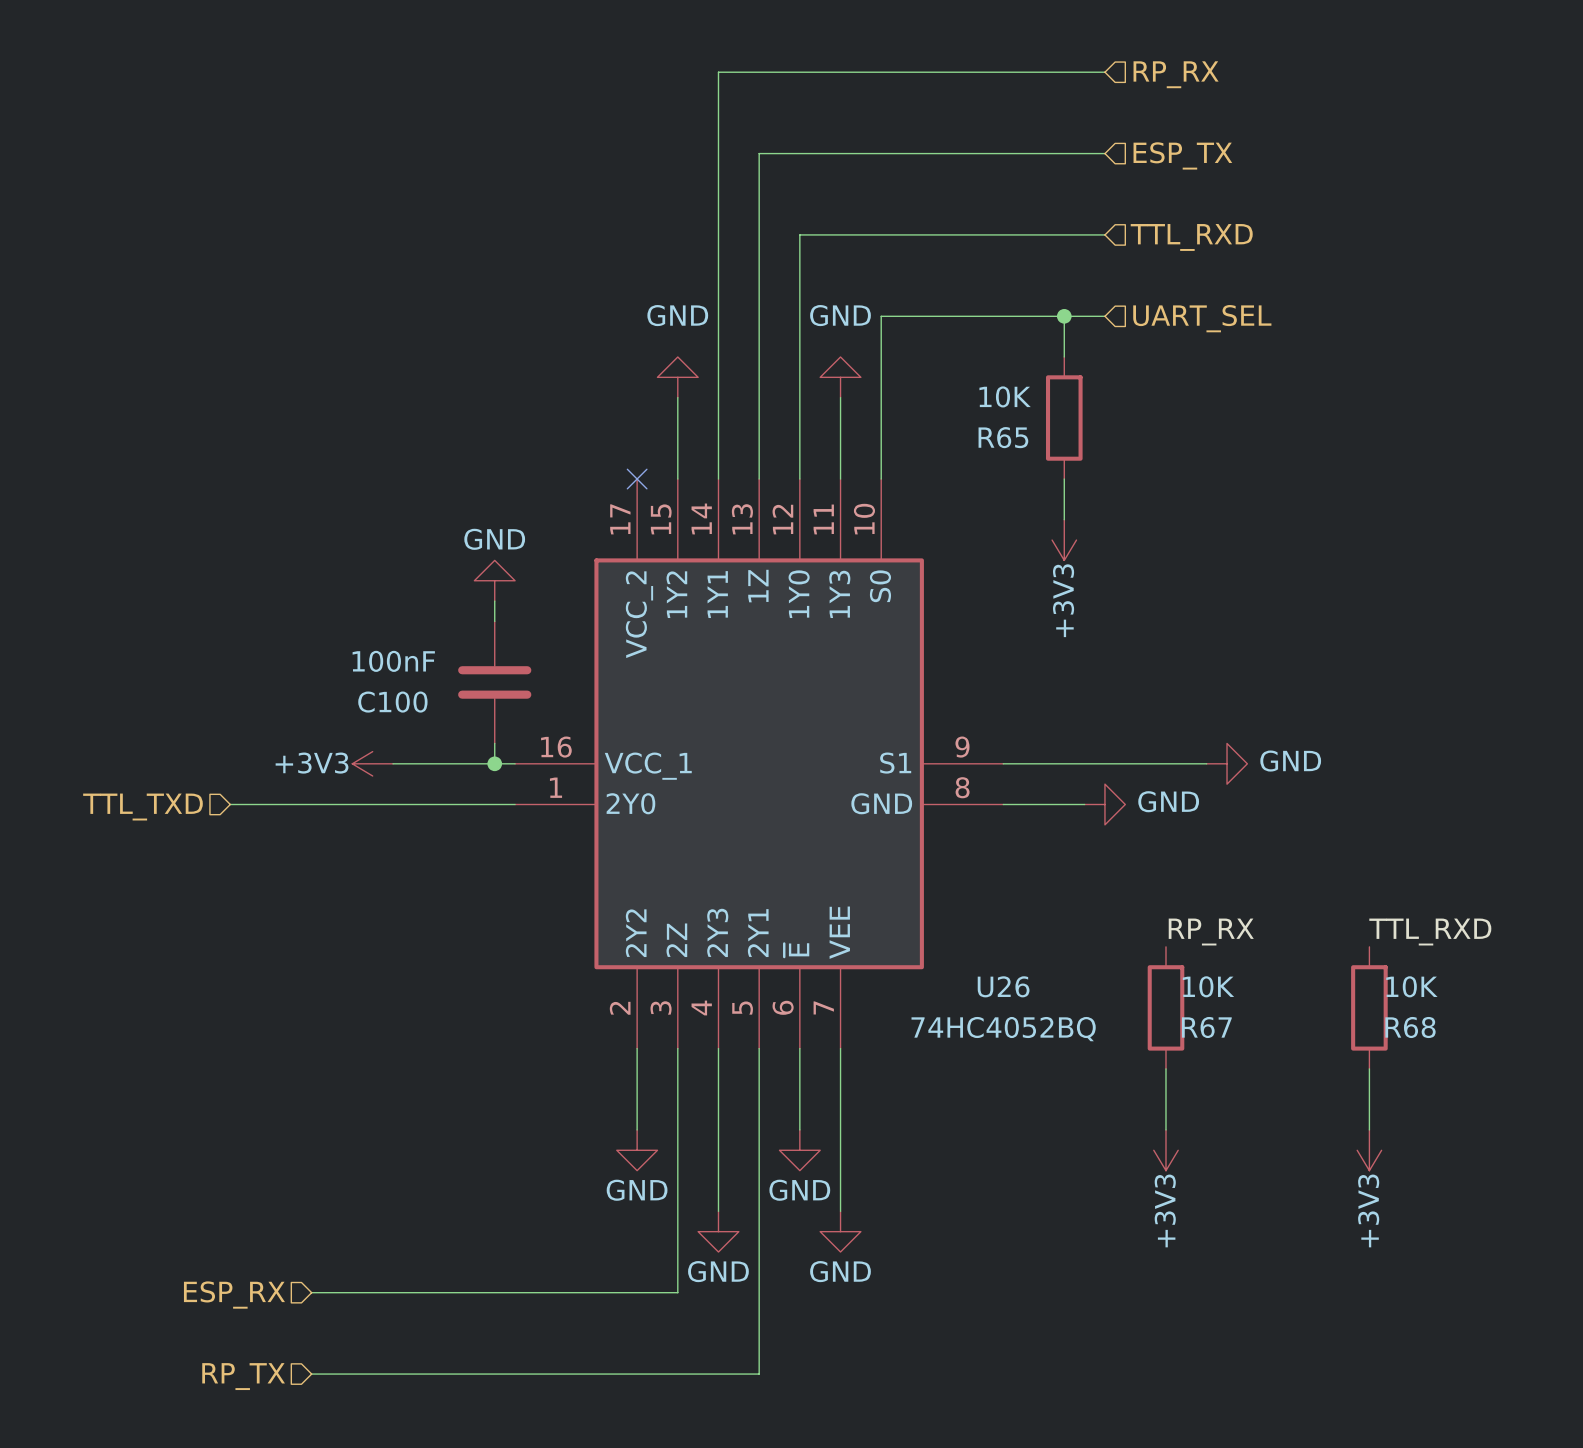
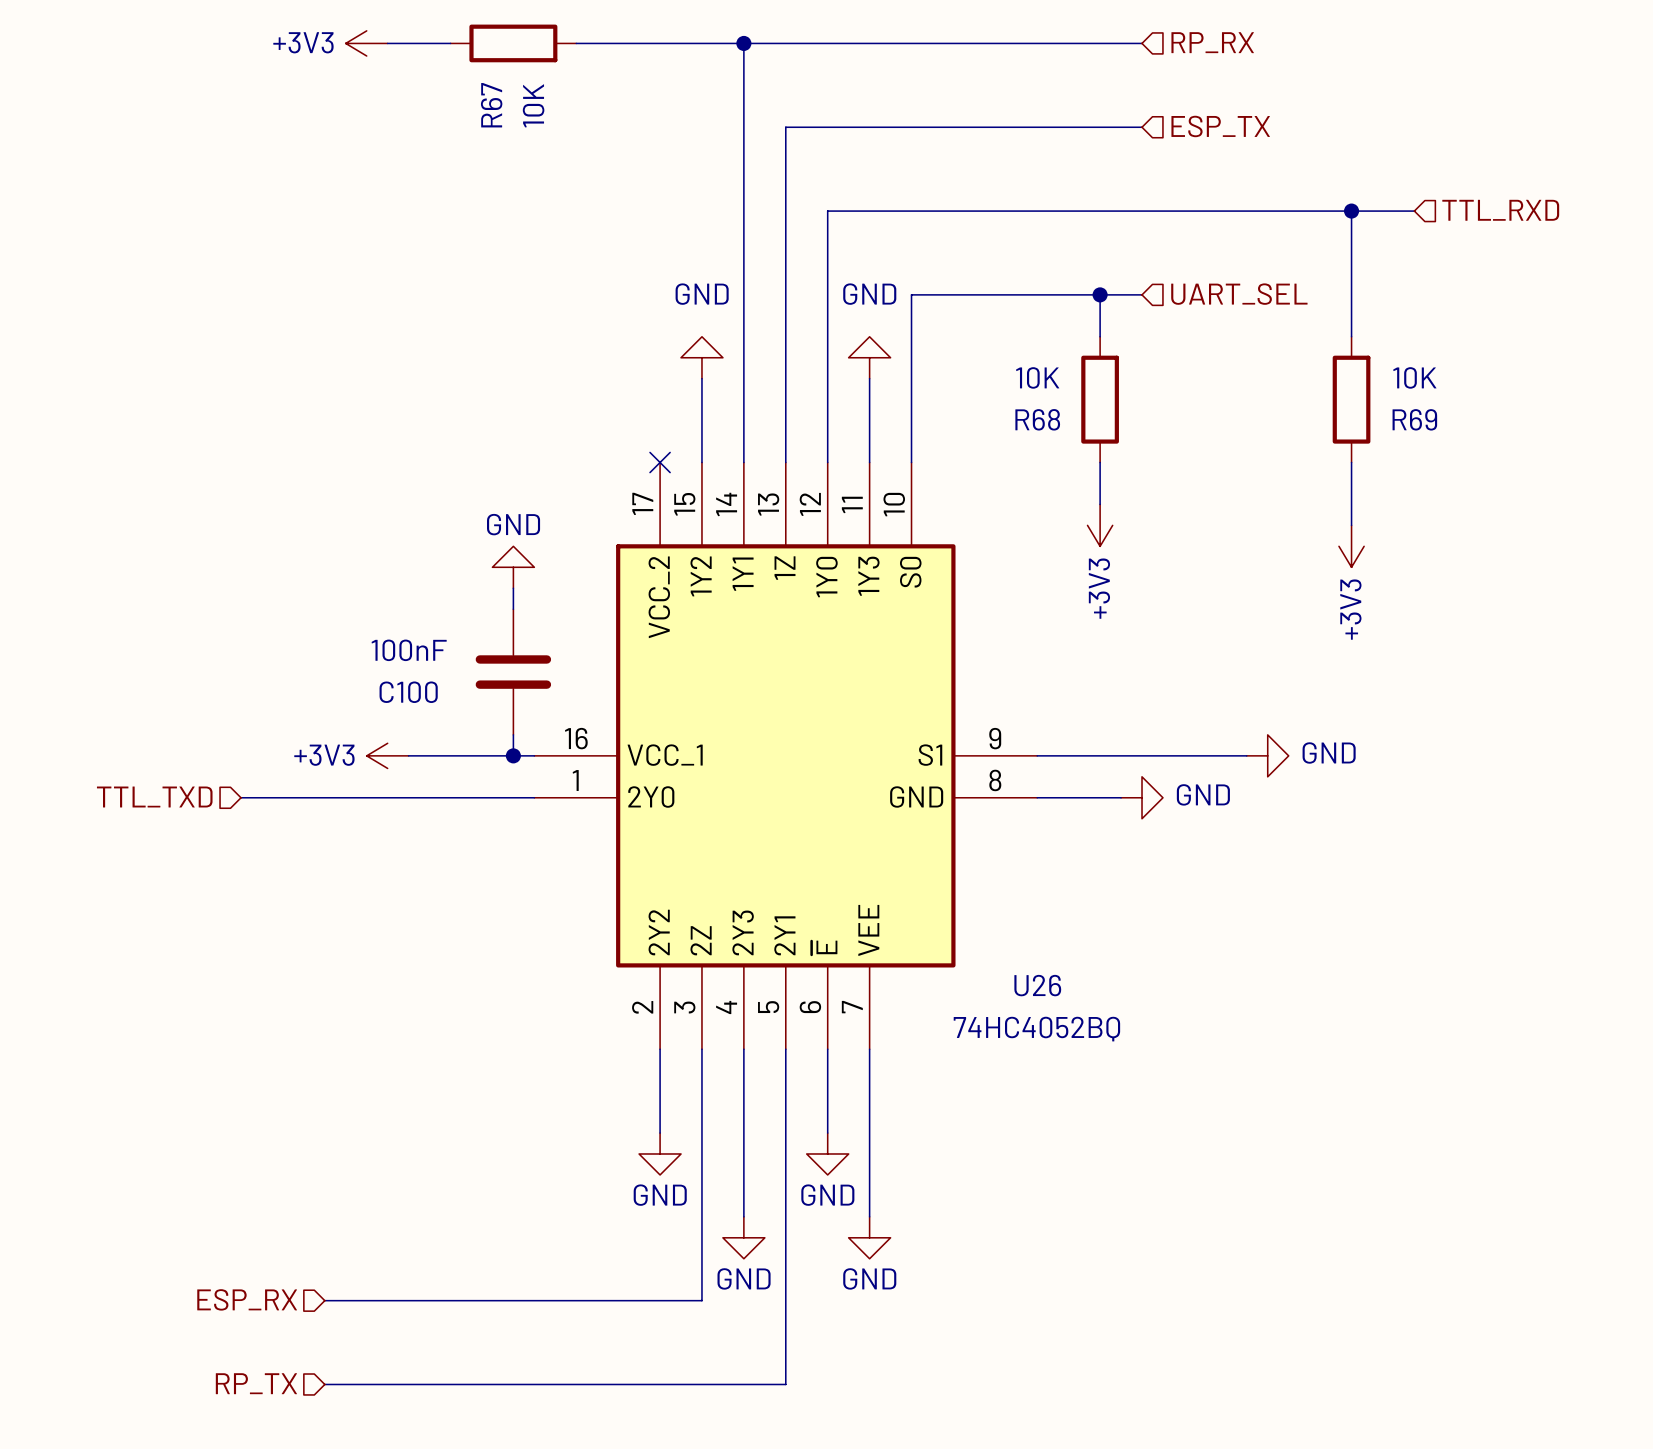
power symbol: none -> +3V3 (366, 43)
wire: none -> (387, 43) (450, 43)
wire: none -> (576, 43) (743, 43)
junction: none -> (743, 43)
wire: none -> (1142, 211) (1414, 211)
wire: none -> (1351, 211) (1351, 336)
junction: none -> (1351, 211)
hierarchical label position: TTL_RXD (1191, 237) -> TTL_RXD (1500, 210)
R69: none -> 10K (1351, 399)
R65 name: R65 (1003, 437) -> R68 (1037, 419)
wire: none -> (1351, 462) (1351, 525)
power symbol: none -> +3V3 (1351, 546)
label: RP_RX (1211, 932) -> none
label: TTL_RXD (1430, 932) -> none
R67 rotation: 0° (1165, 1007) -> 90° clockwise (513, 43)
R67 position: (1165, 1007) -> (513, 43)
R68: 10K (1369, 1007) -> none
wire: (1165, 1068) (1165, 1129) -> none
wire: (1369, 1068) (1369, 1129) -> none
power symbol: +3V3 (1165, 1150) -> none
power symbol: +3V3 (1369, 1150) -> none

